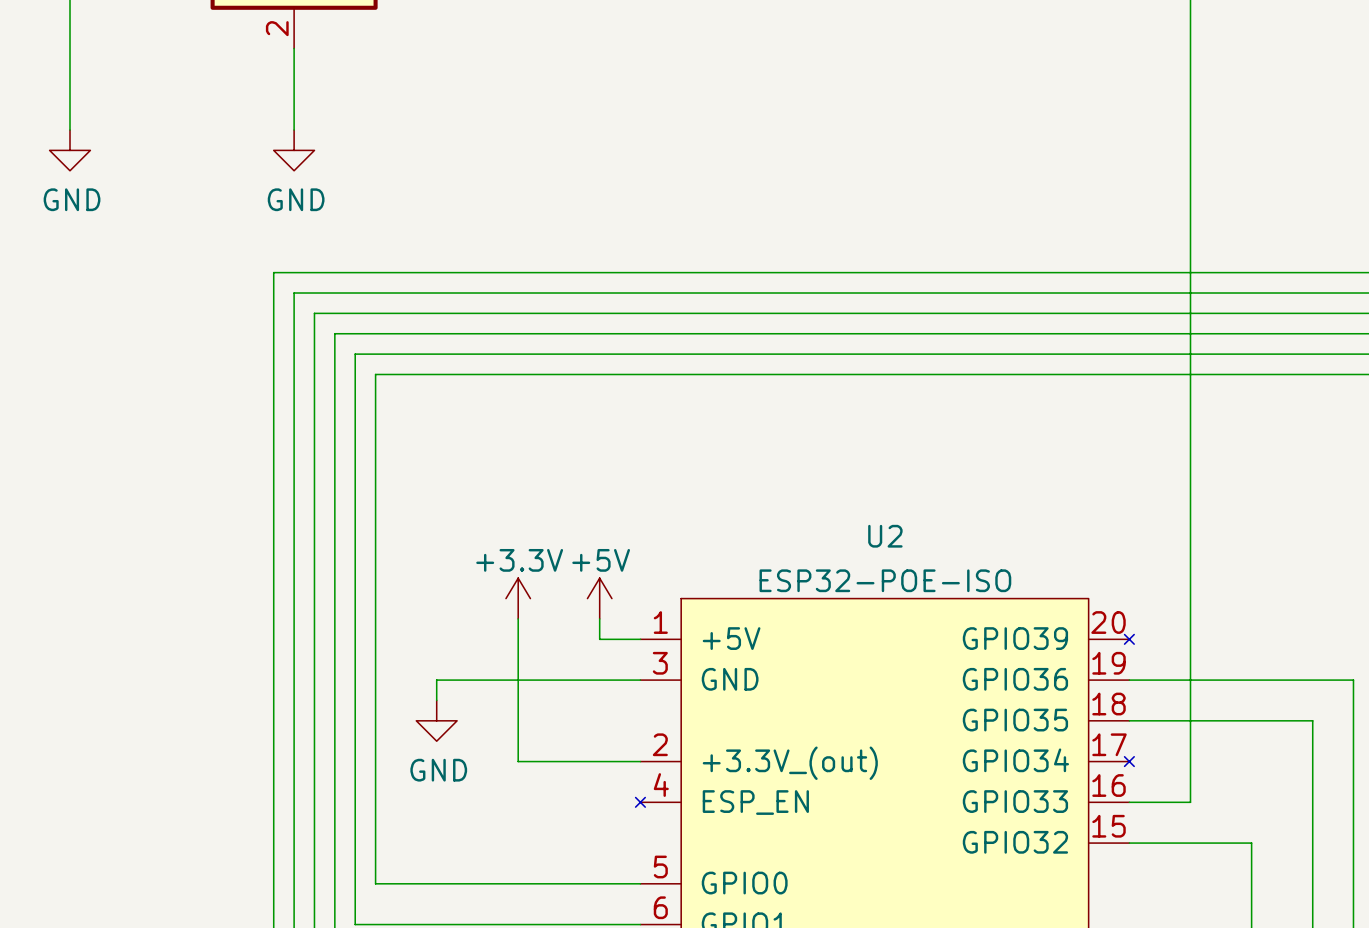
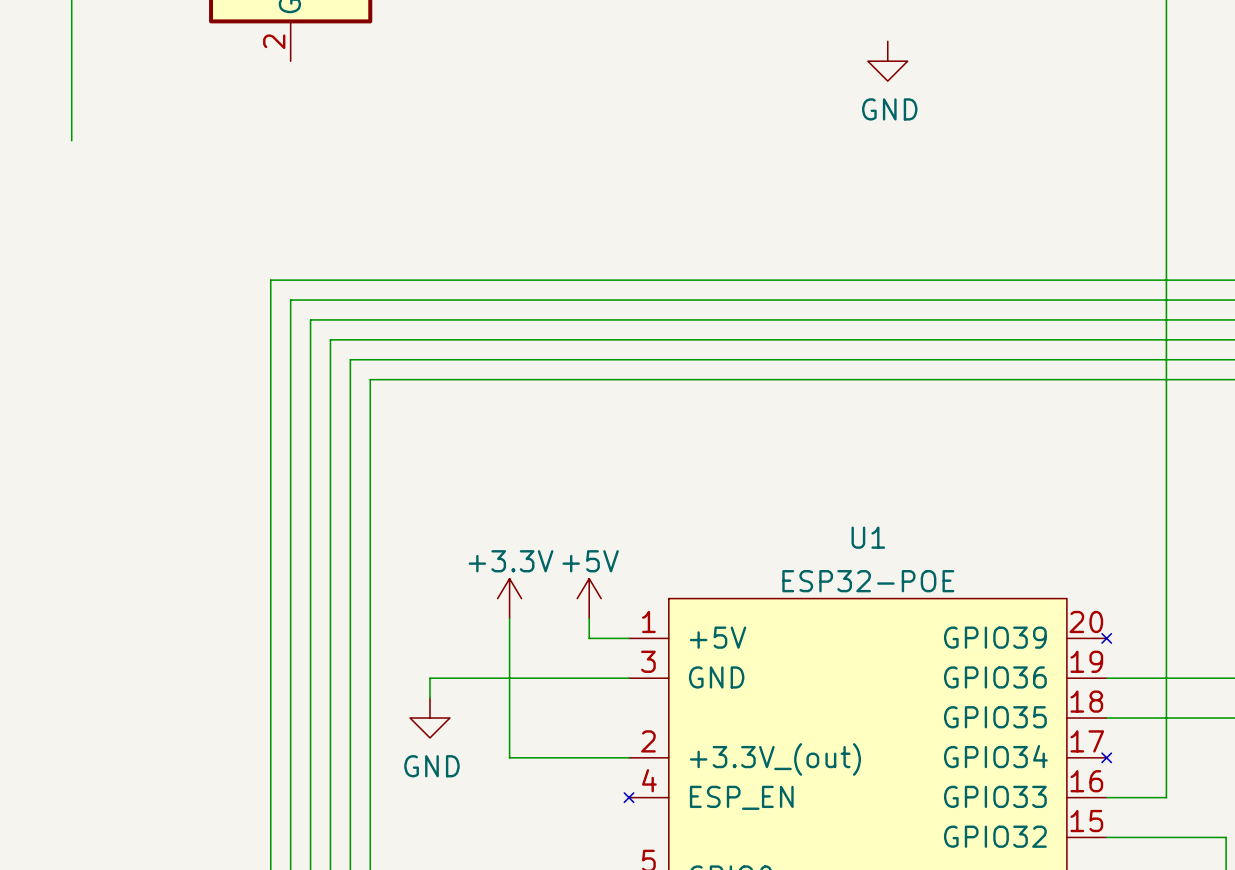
wire: (294, 48) (294, 130) -> none
power symbol: none -> GND (887, 61)
power symbol: GND (70, 150) -> none
power symbol: GND (294, 150) -> none
U2 name: U2 (885, 536) -> U1 (868, 537)
U2 value: ESP32-POE-ISO (885, 580) -> ESP32-POE (868, 581)

